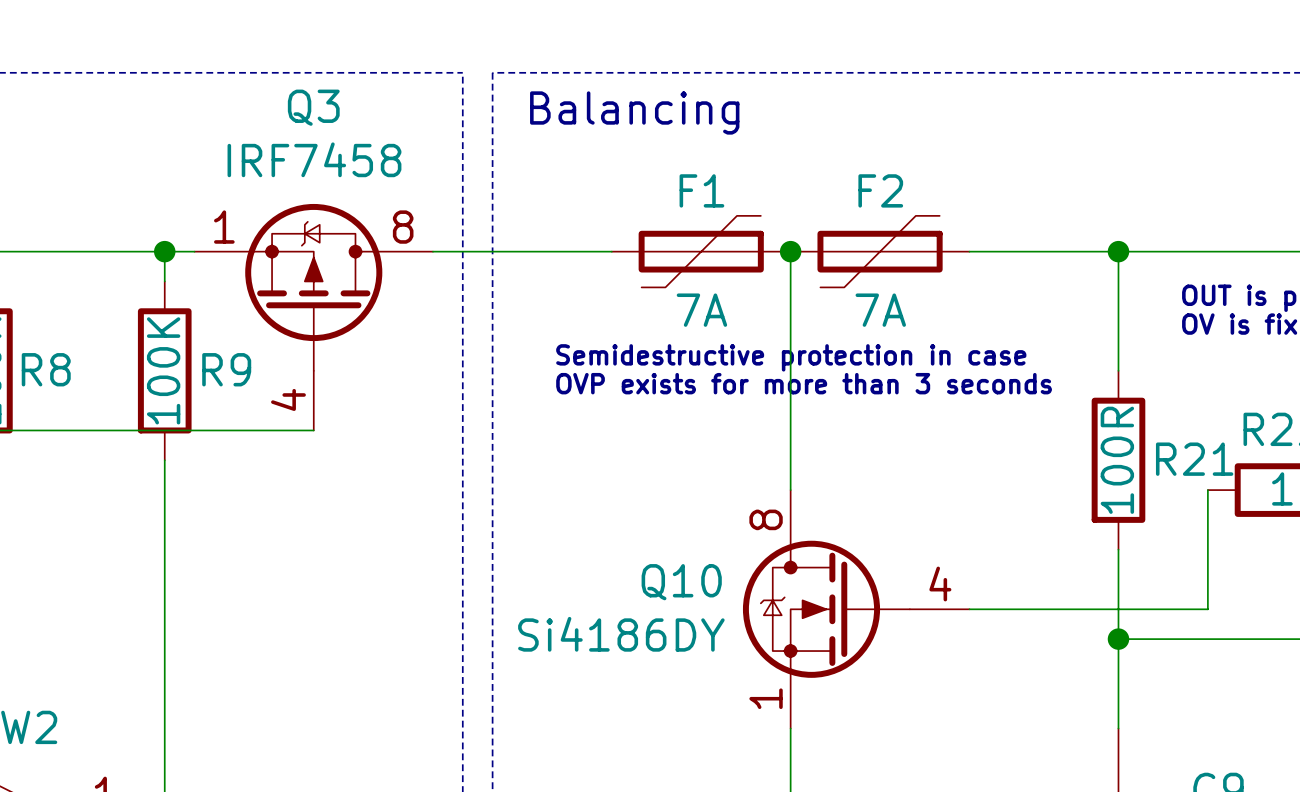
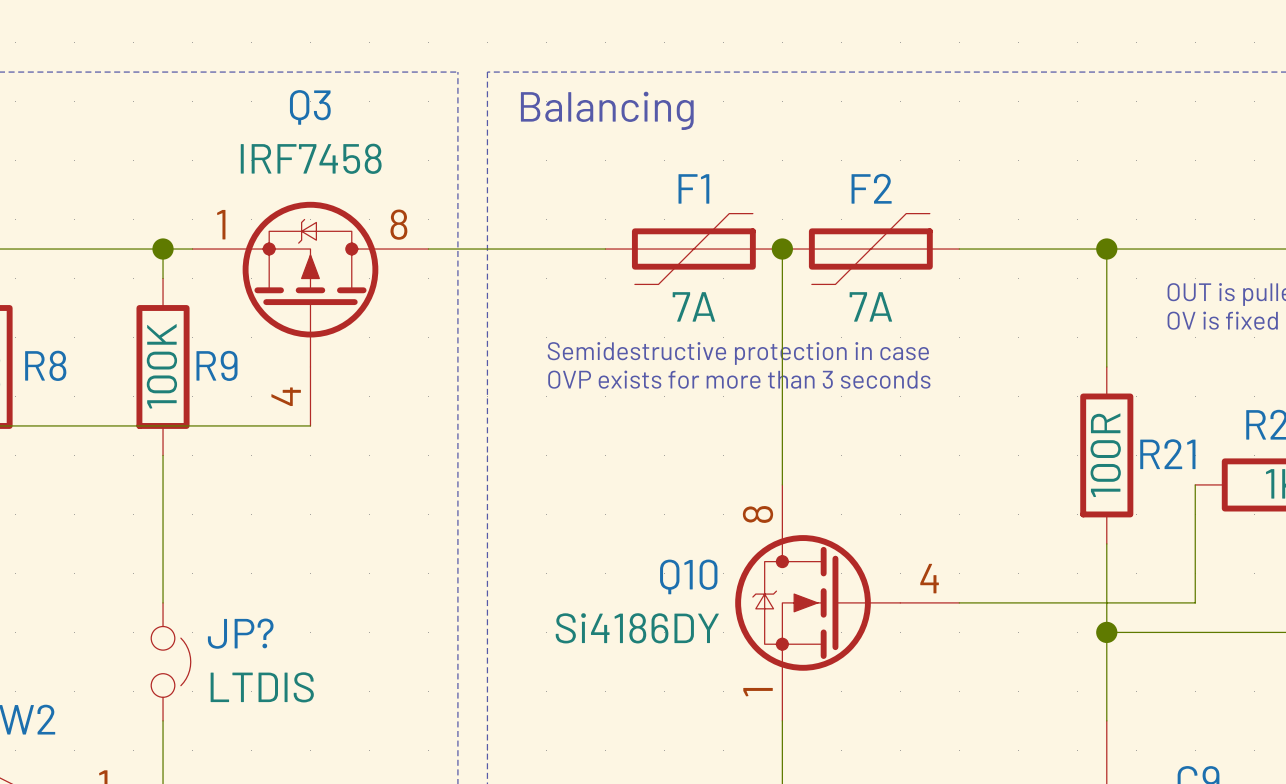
wire: (164, 609) (164, 728) -> none
JP?: none -> LTDIS (170, 661)

